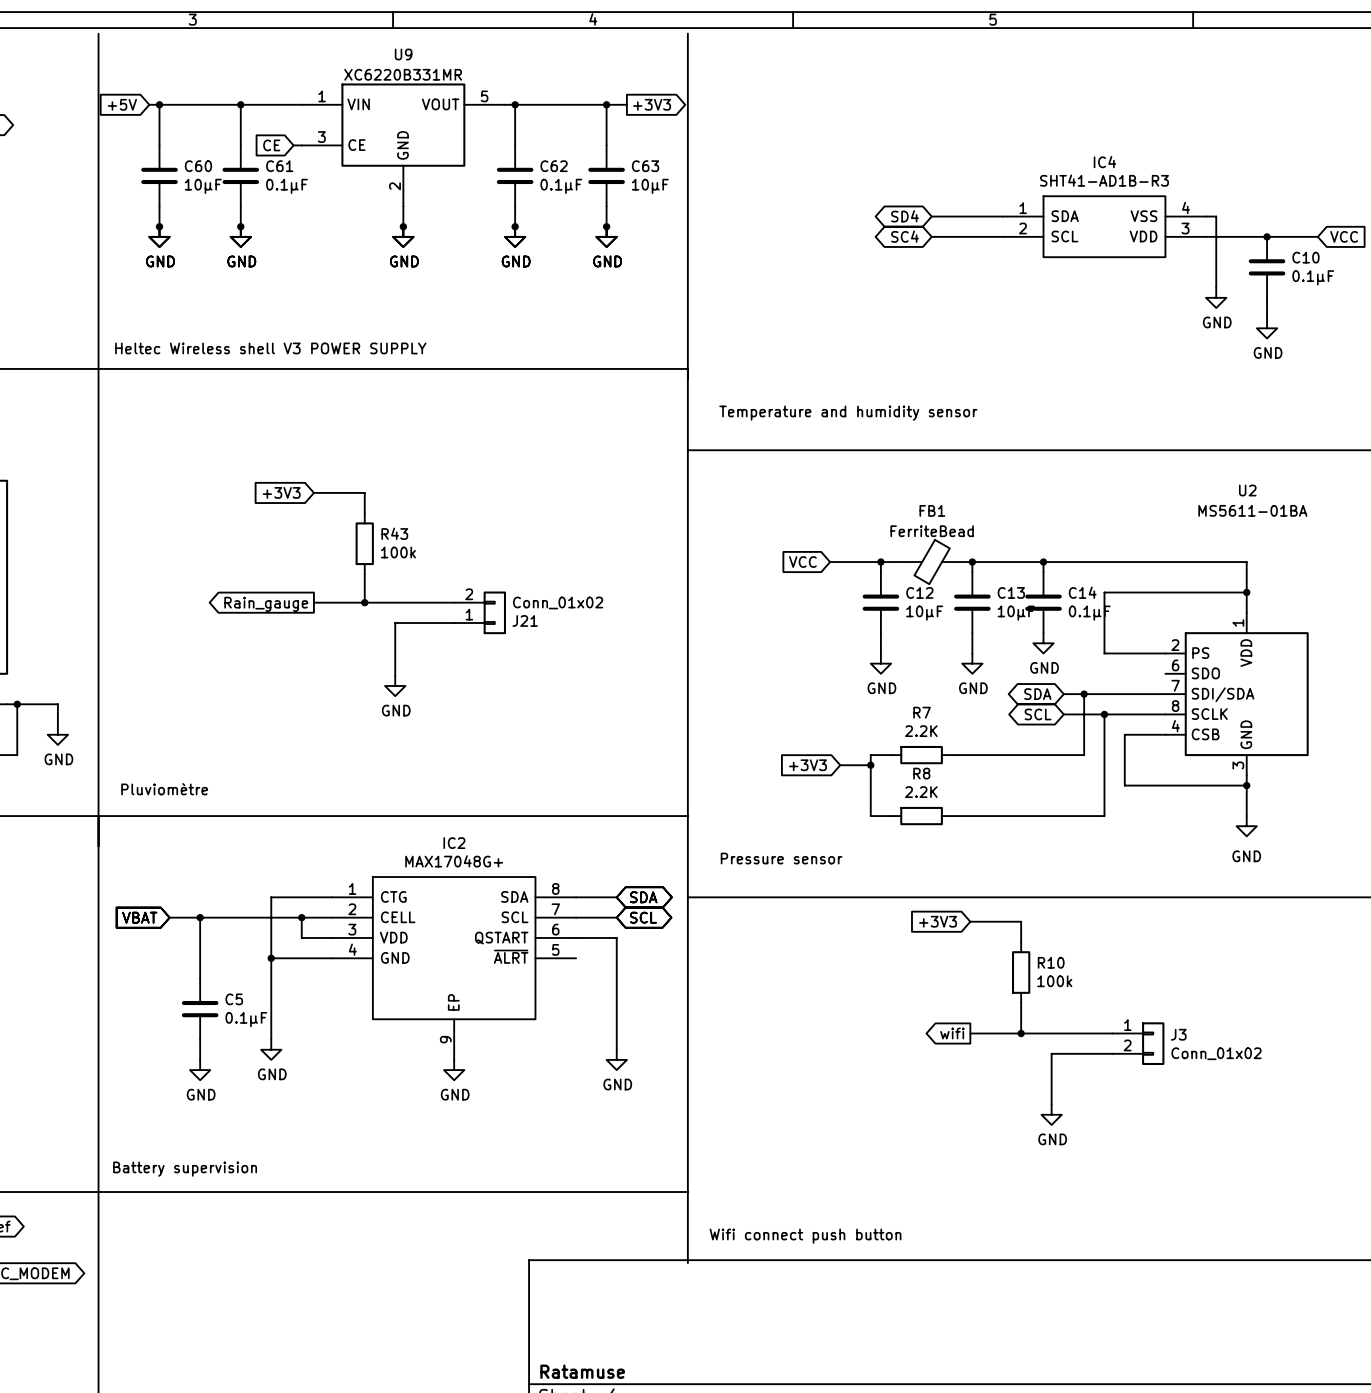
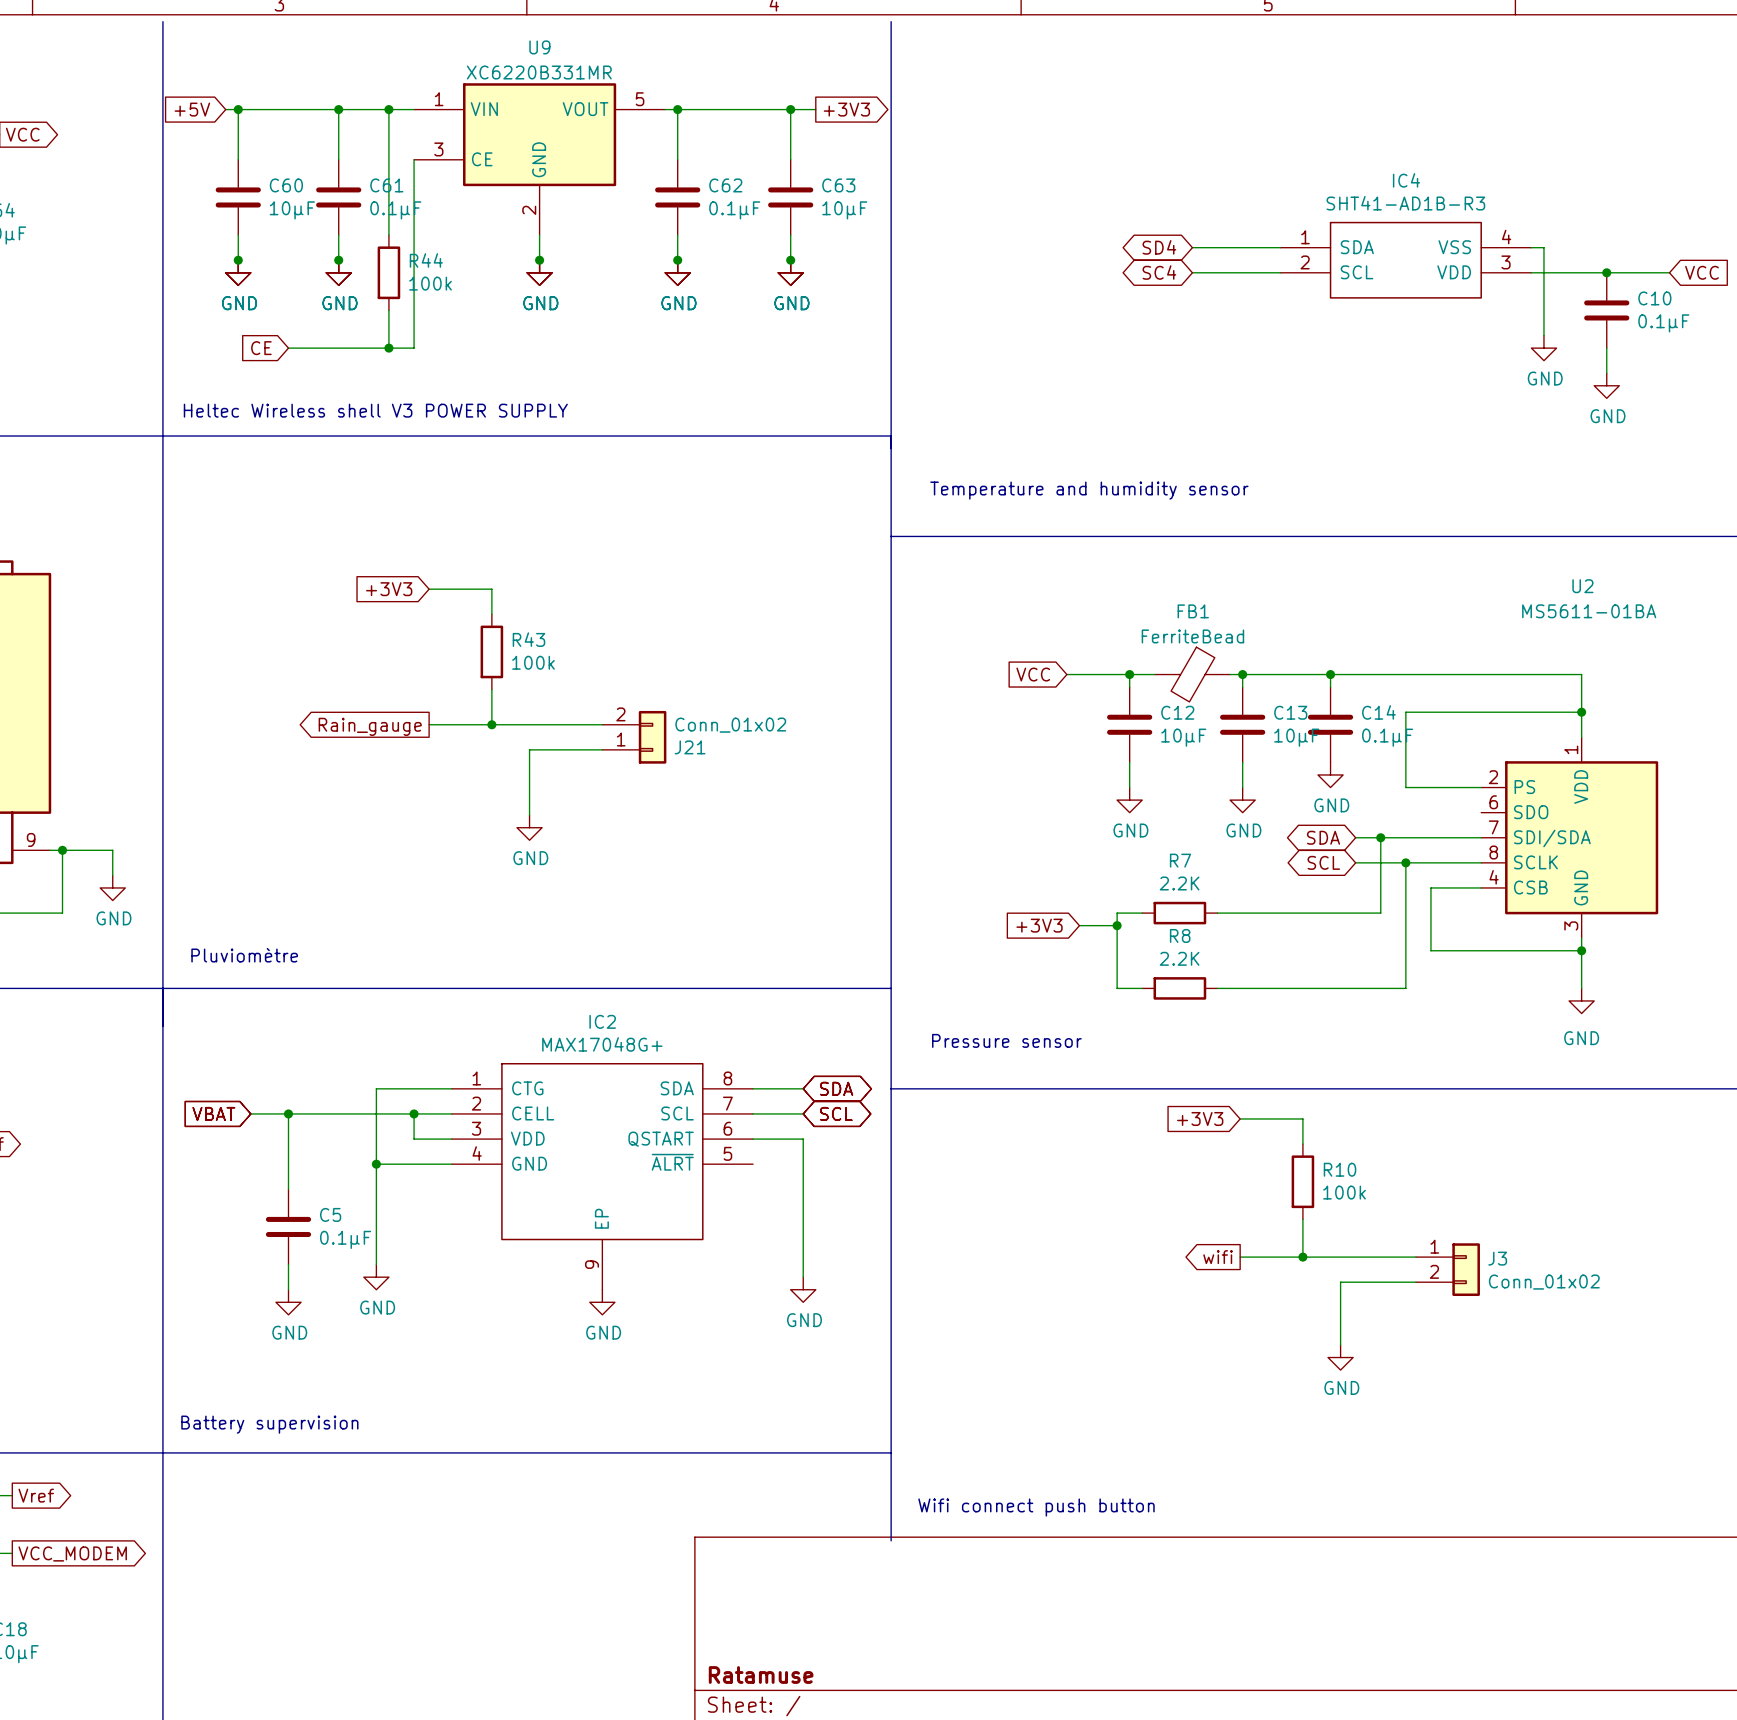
wire: none -> (388, 109) (388, 235)
junction: none -> (388, 109)
global label position: CE (271, 145) -> CE (261, 348)
wire: (293, 145) (301, 145) -> (288, 348) (414, 348) (414, 159)
R44: none -> 100k (388, 272)
wire: none -> (388, 310) (388, 348)
junction: none -> (388, 348)

